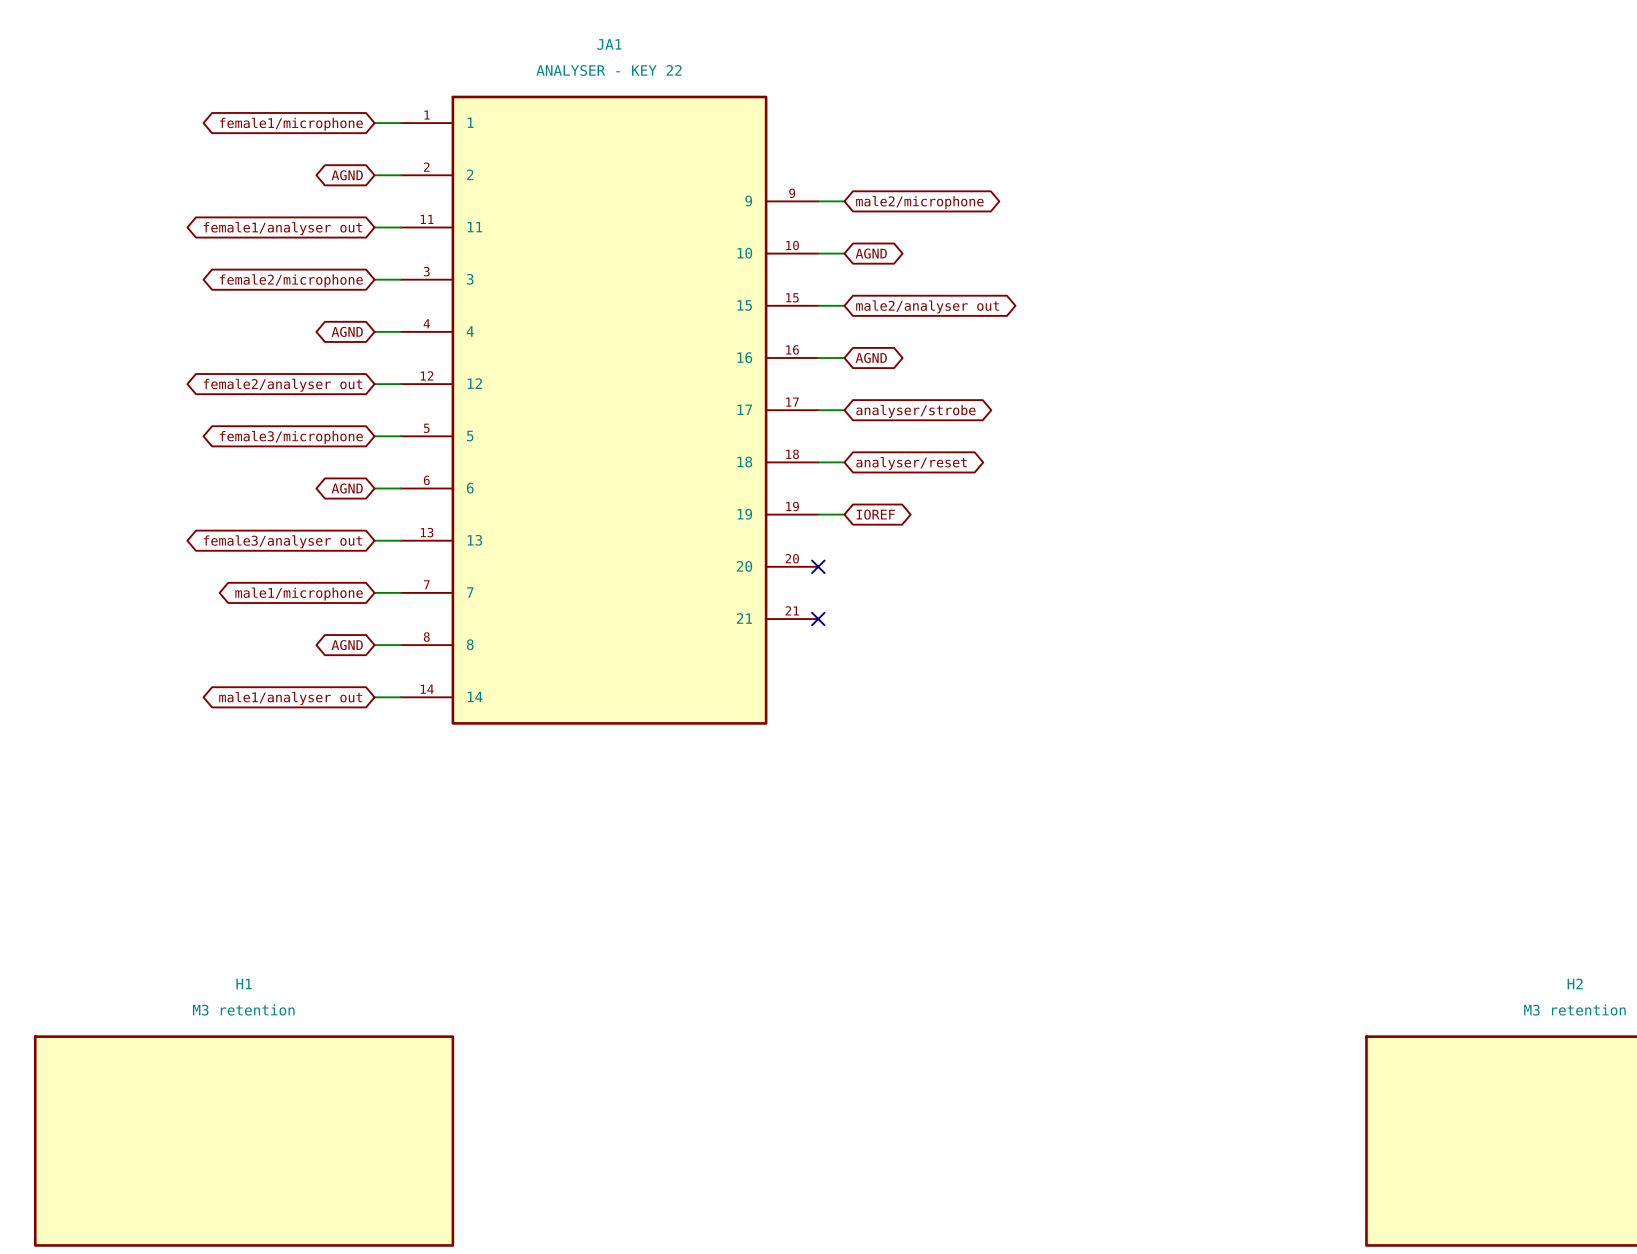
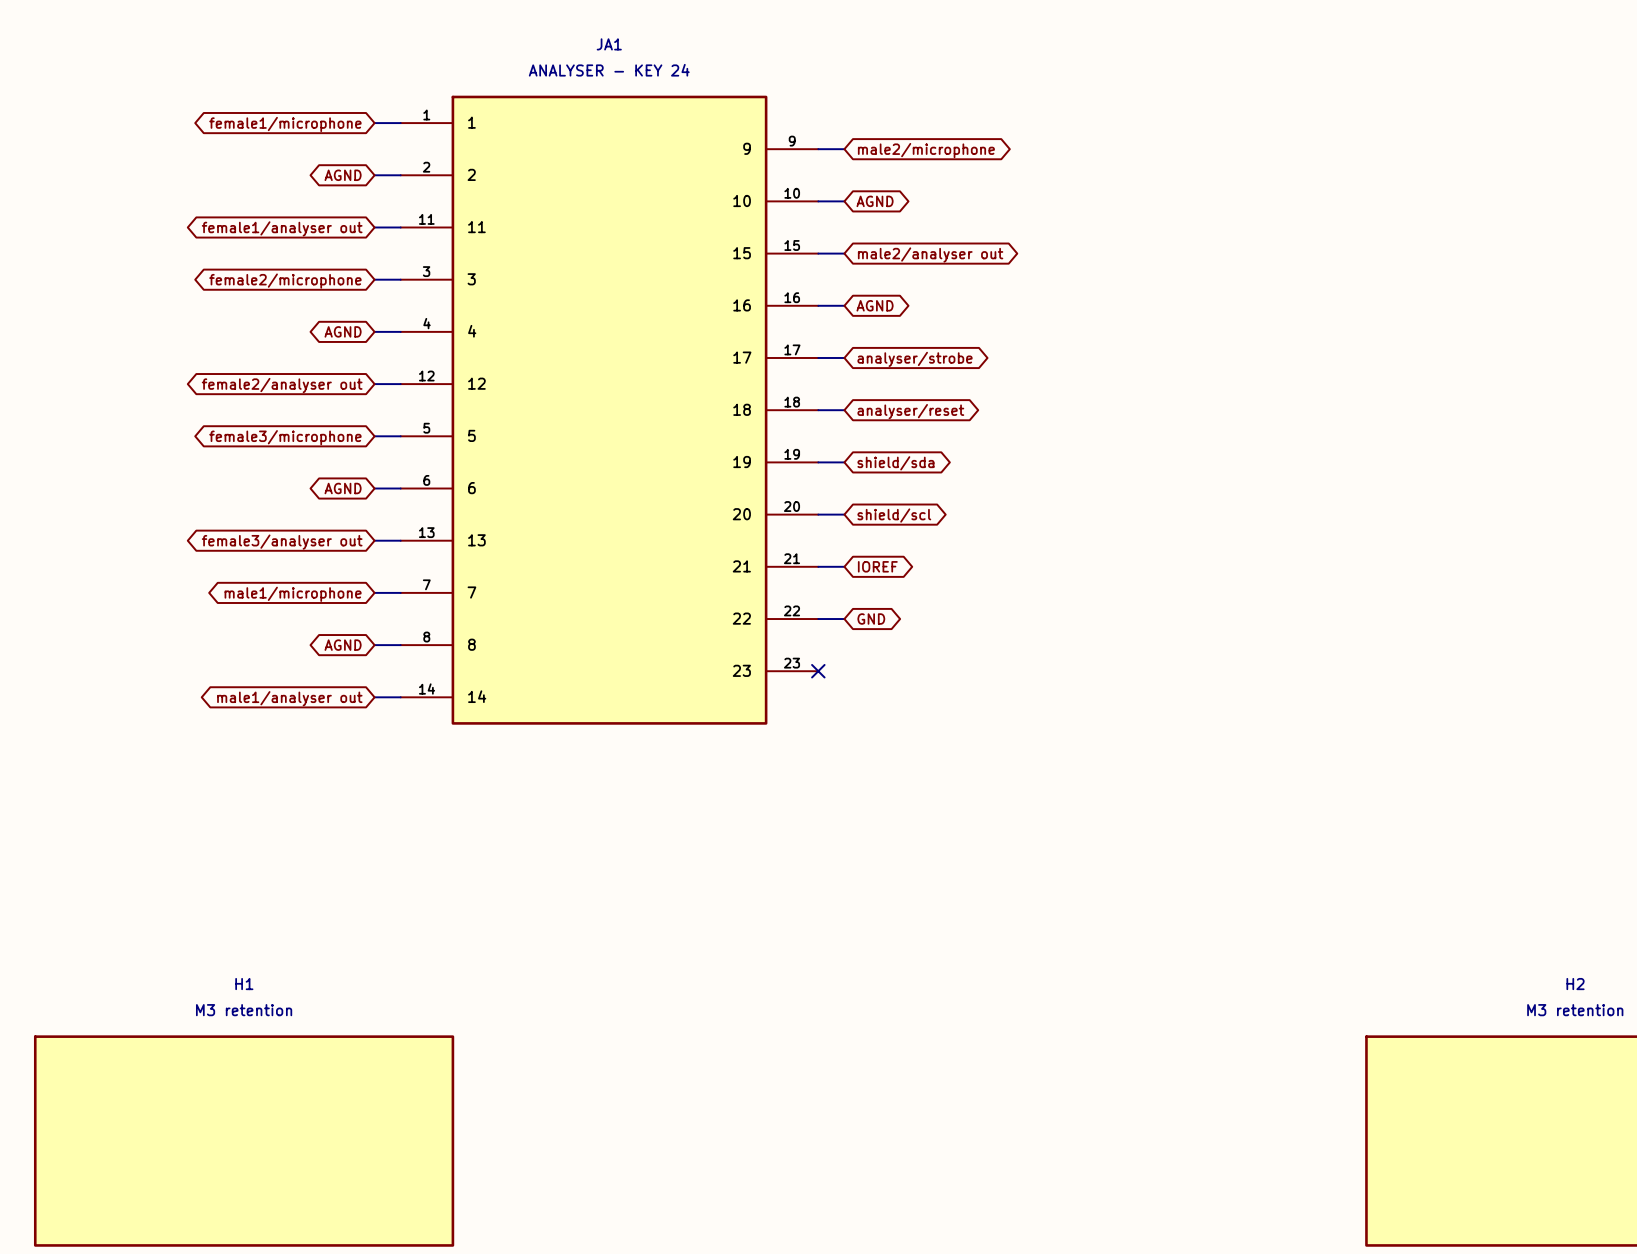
JA1 value: ANALYSER - KEY 22 (609, 70) -> ANALYSER - KEY 24 (609, 70)
JA1 symbol: [400, 95, 819, 725] -> [400, 95, 819, 725]
wire: none -> (818, 149) (844, 149)
global label: none -> male2/microphone (926, 150)
global label: male2/microphone (919, 202) -> AGND (875, 201)
global label: AGND (871, 253) -> male2/analyser out (930, 254)
global label: male2/analyser out (927, 306) -> AGND (875, 305)
global label: AGND (871, 358) -> analyser/strobe (915, 359)
global label: analyser/strobe (915, 411) -> analyser/reset (910, 411)
global label: analyser/reset (911, 463) -> shield/sda (895, 463)
global label: IOREF (875, 514) -> shield/scl (894, 515)
wire: none -> (818, 566) (844, 566)
no-connect mark: (818, 566) -> none
global label: none -> IOREF (877, 566)
wire: none -> (818, 619) (844, 619)
no-connect mark: (818, 619) -> none
global label: none -> GND (871, 619)
no-connect mark: none -> (818, 671)

